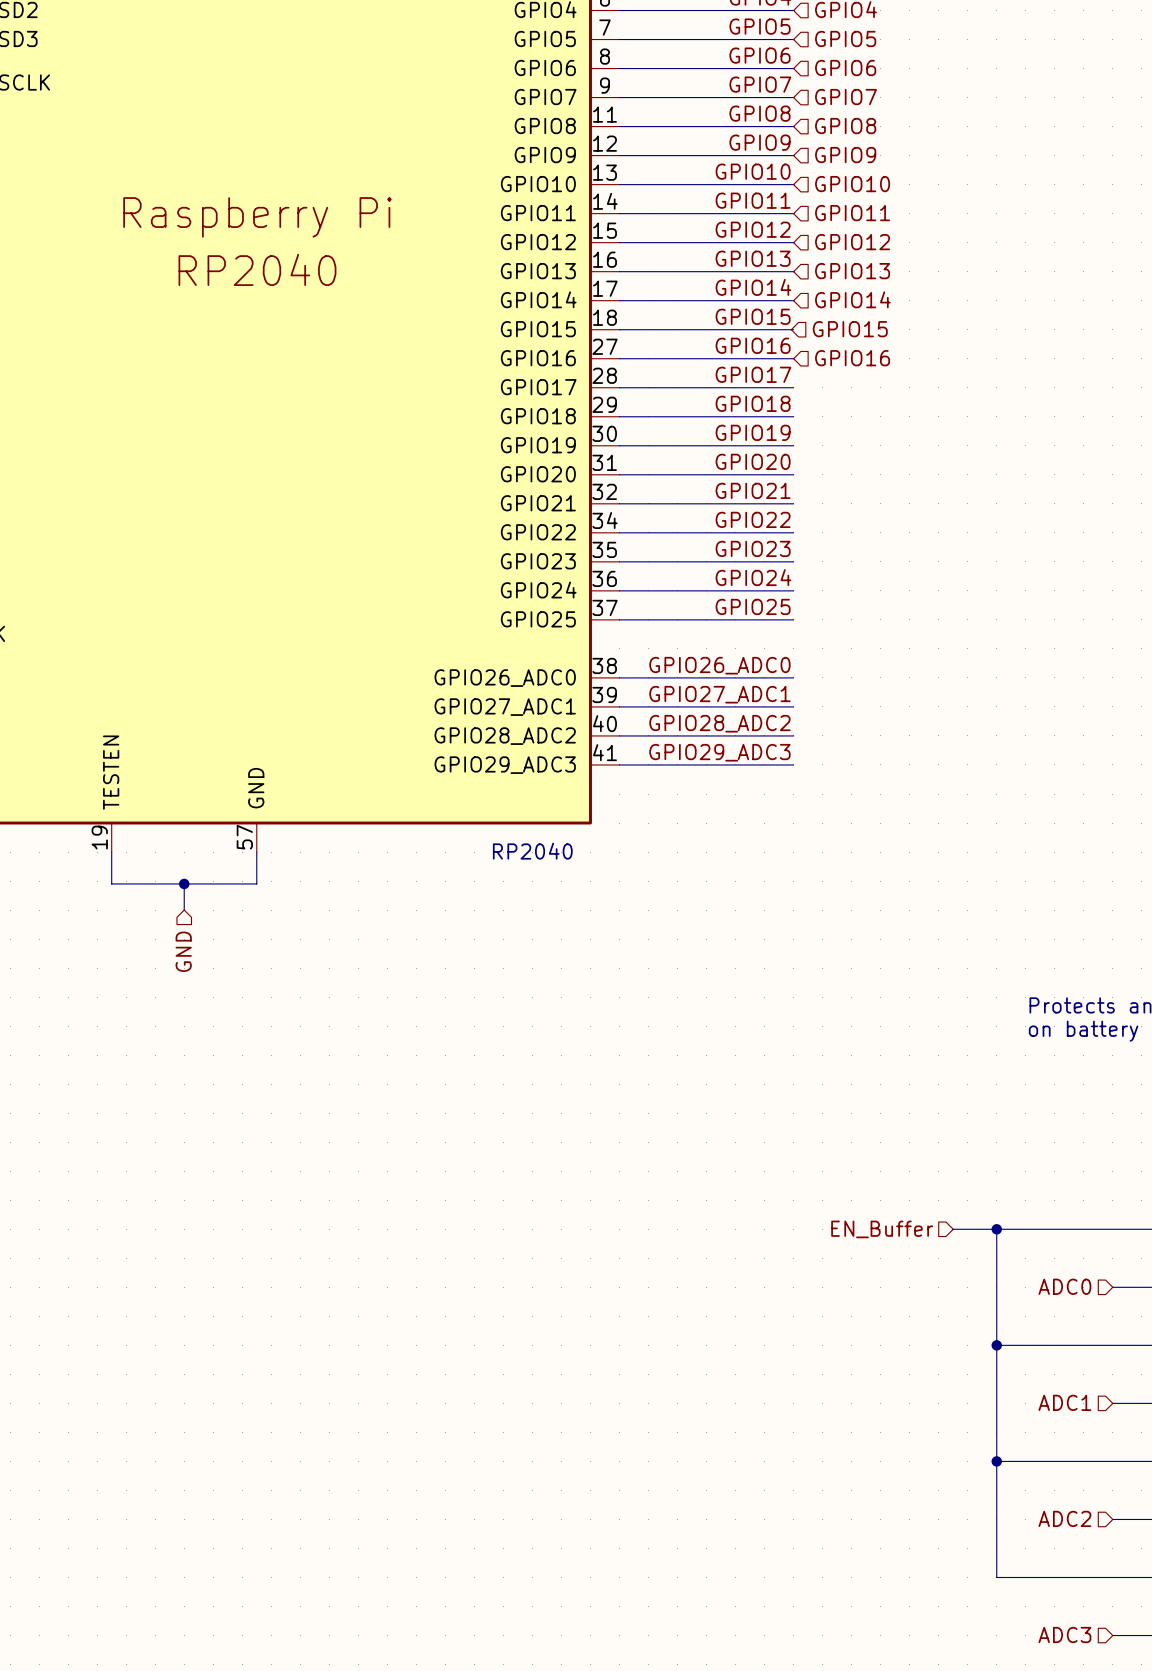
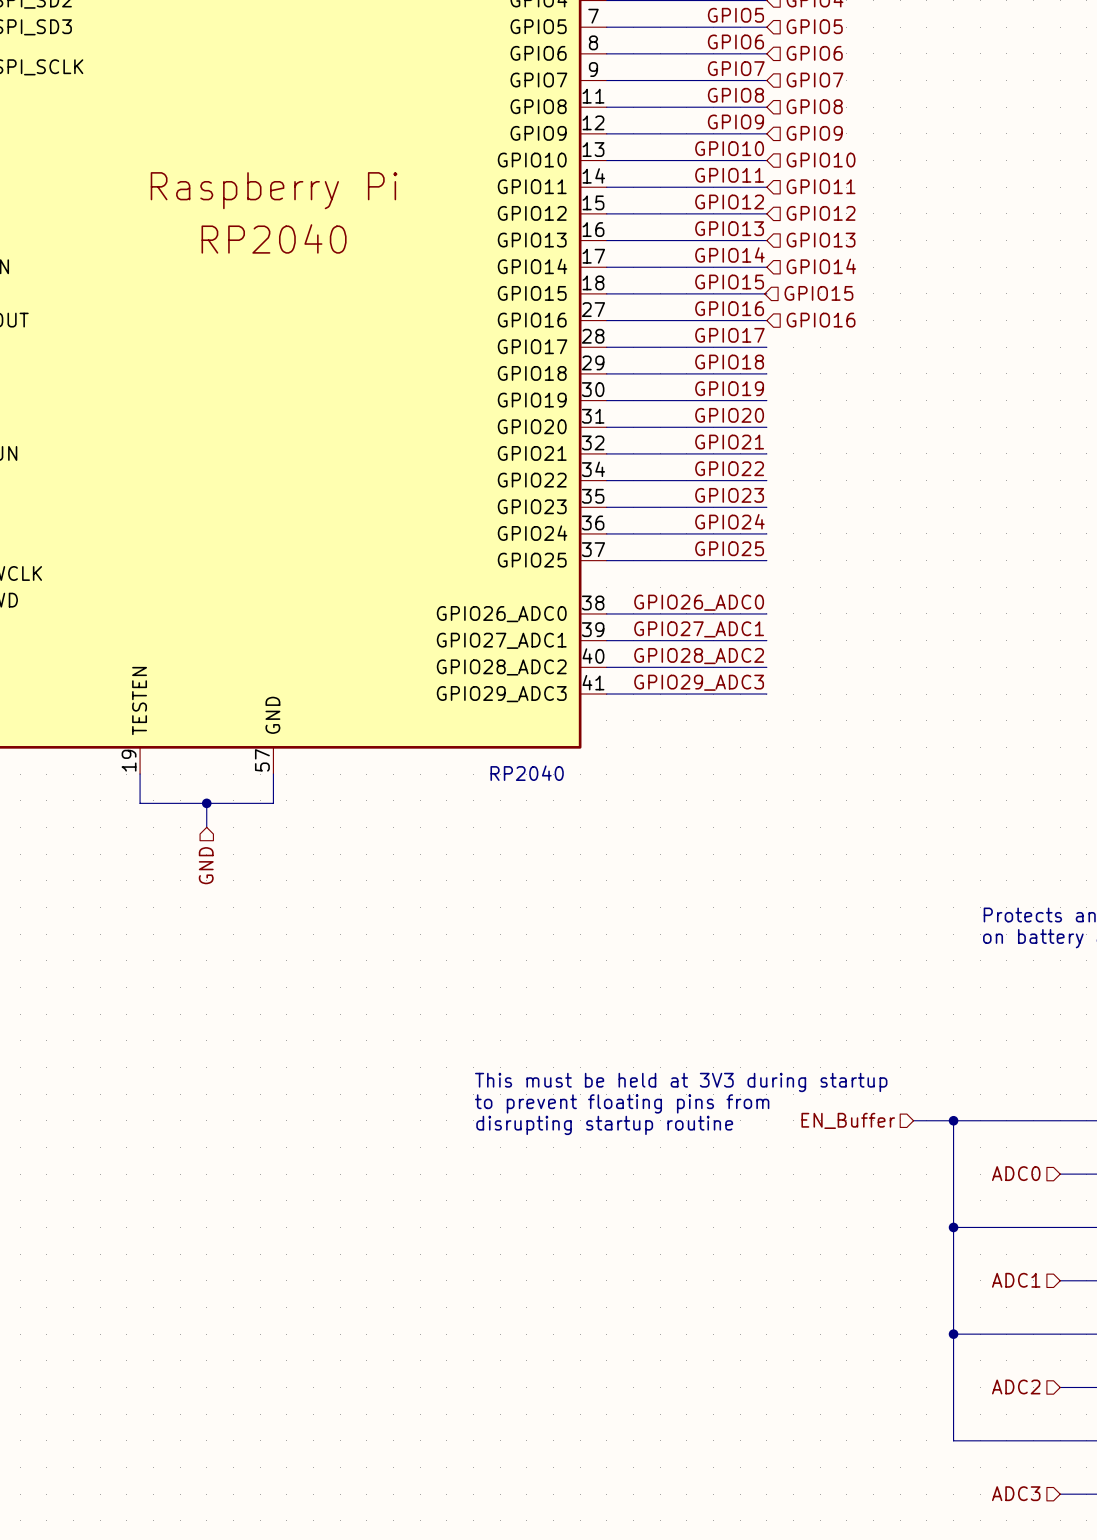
text: none -> This must be held at 3V3 during startup (681, 1082)
text: none -> to prevent floating pins from (622, 1103)
text: none -> disrupting startup routine (604, 1125)

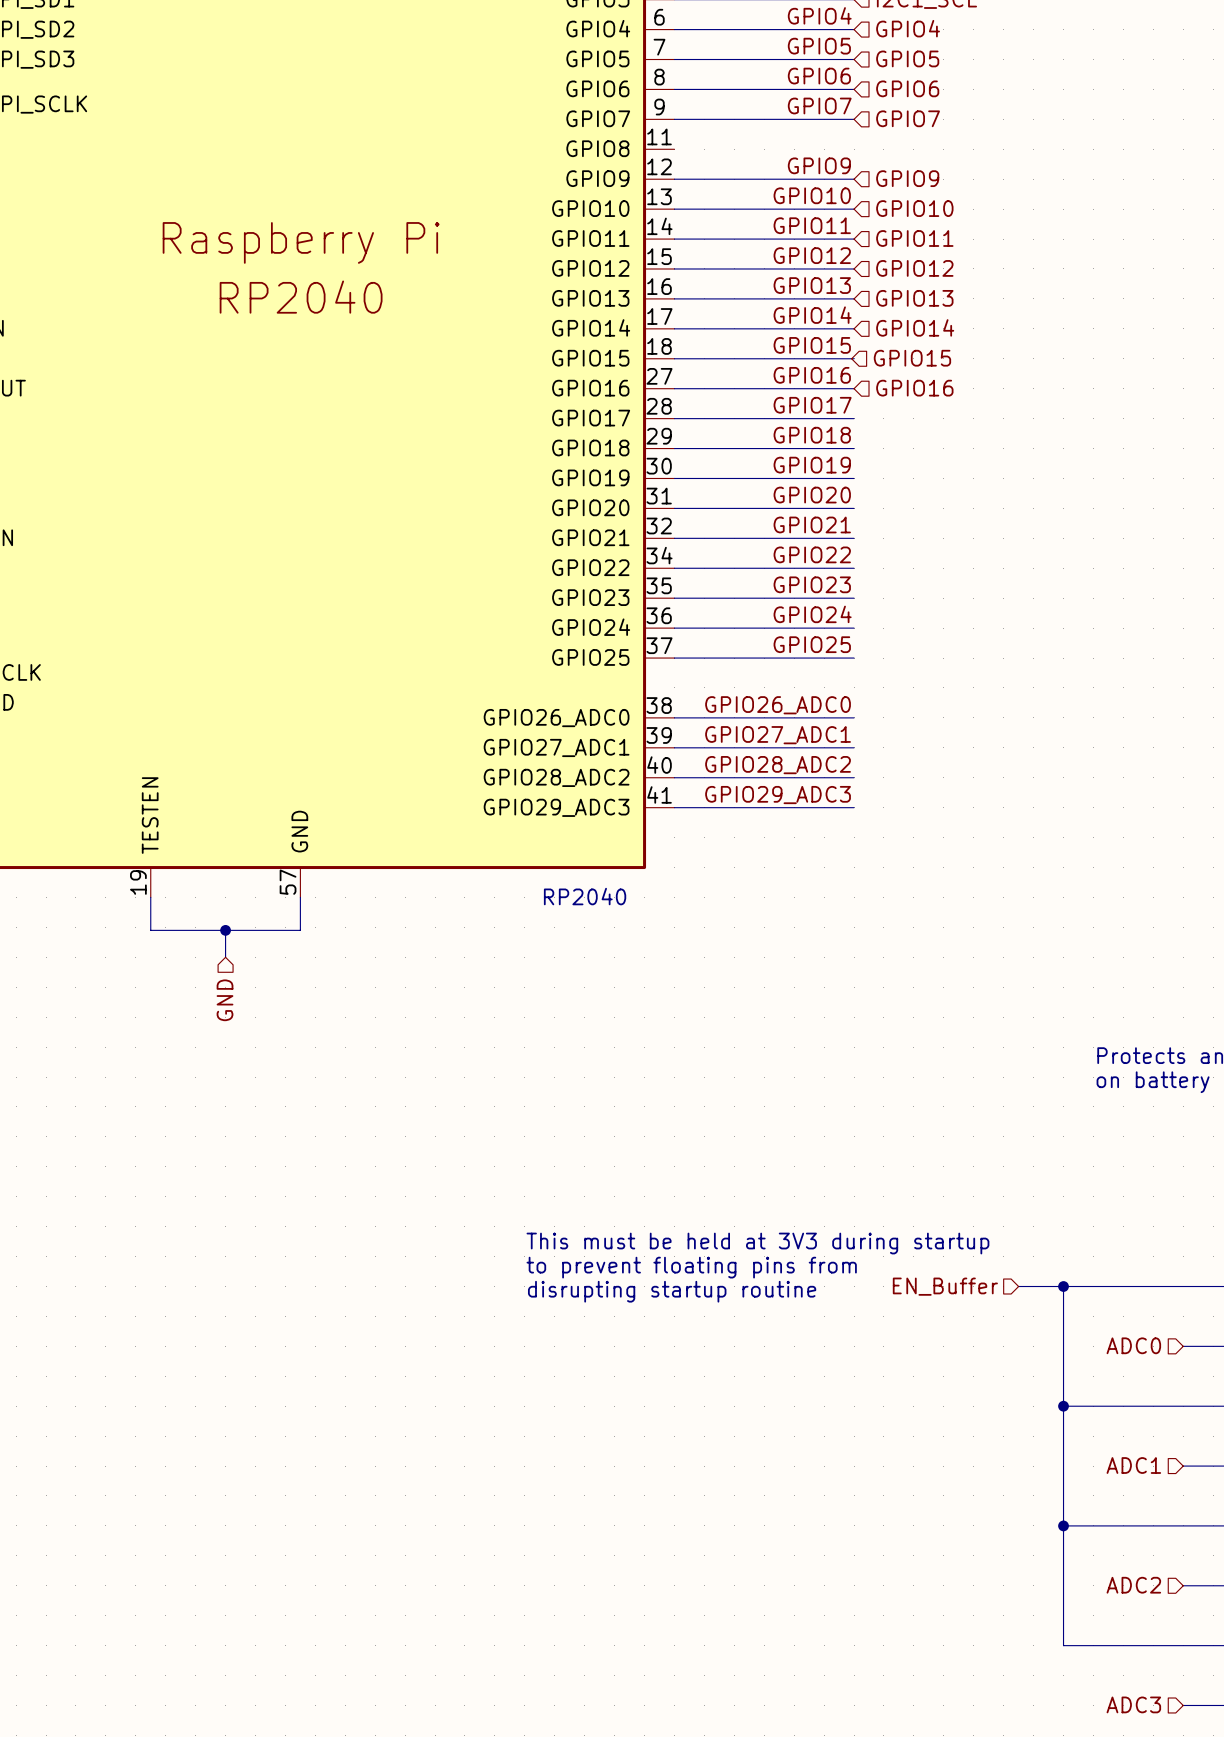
label: GPIO8 (735, 95) -> none
hierarchical label: GPIO8 (814, 106) -> none
wire: (606, 107) (766, 107) -> none

